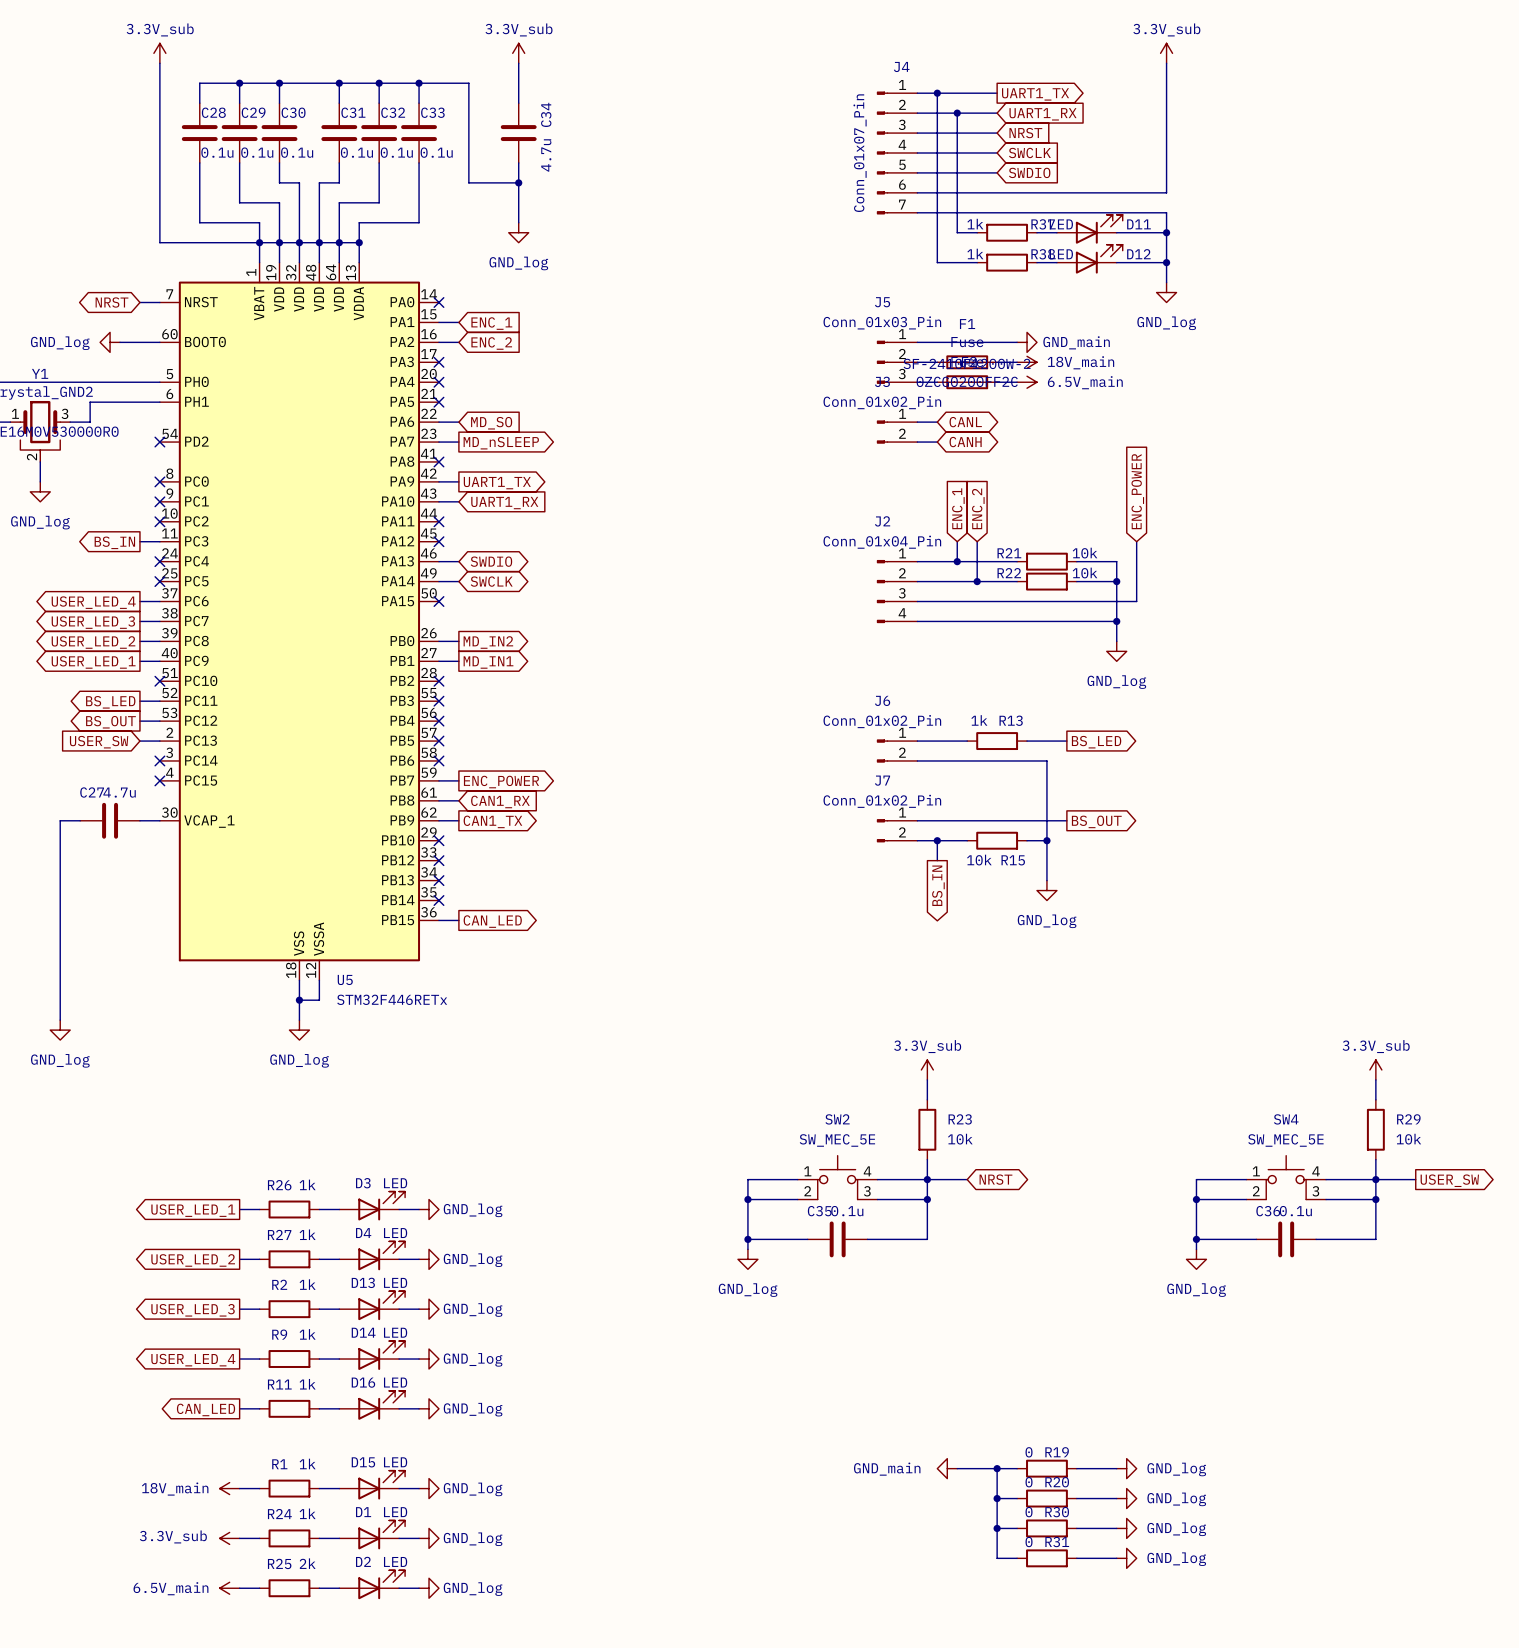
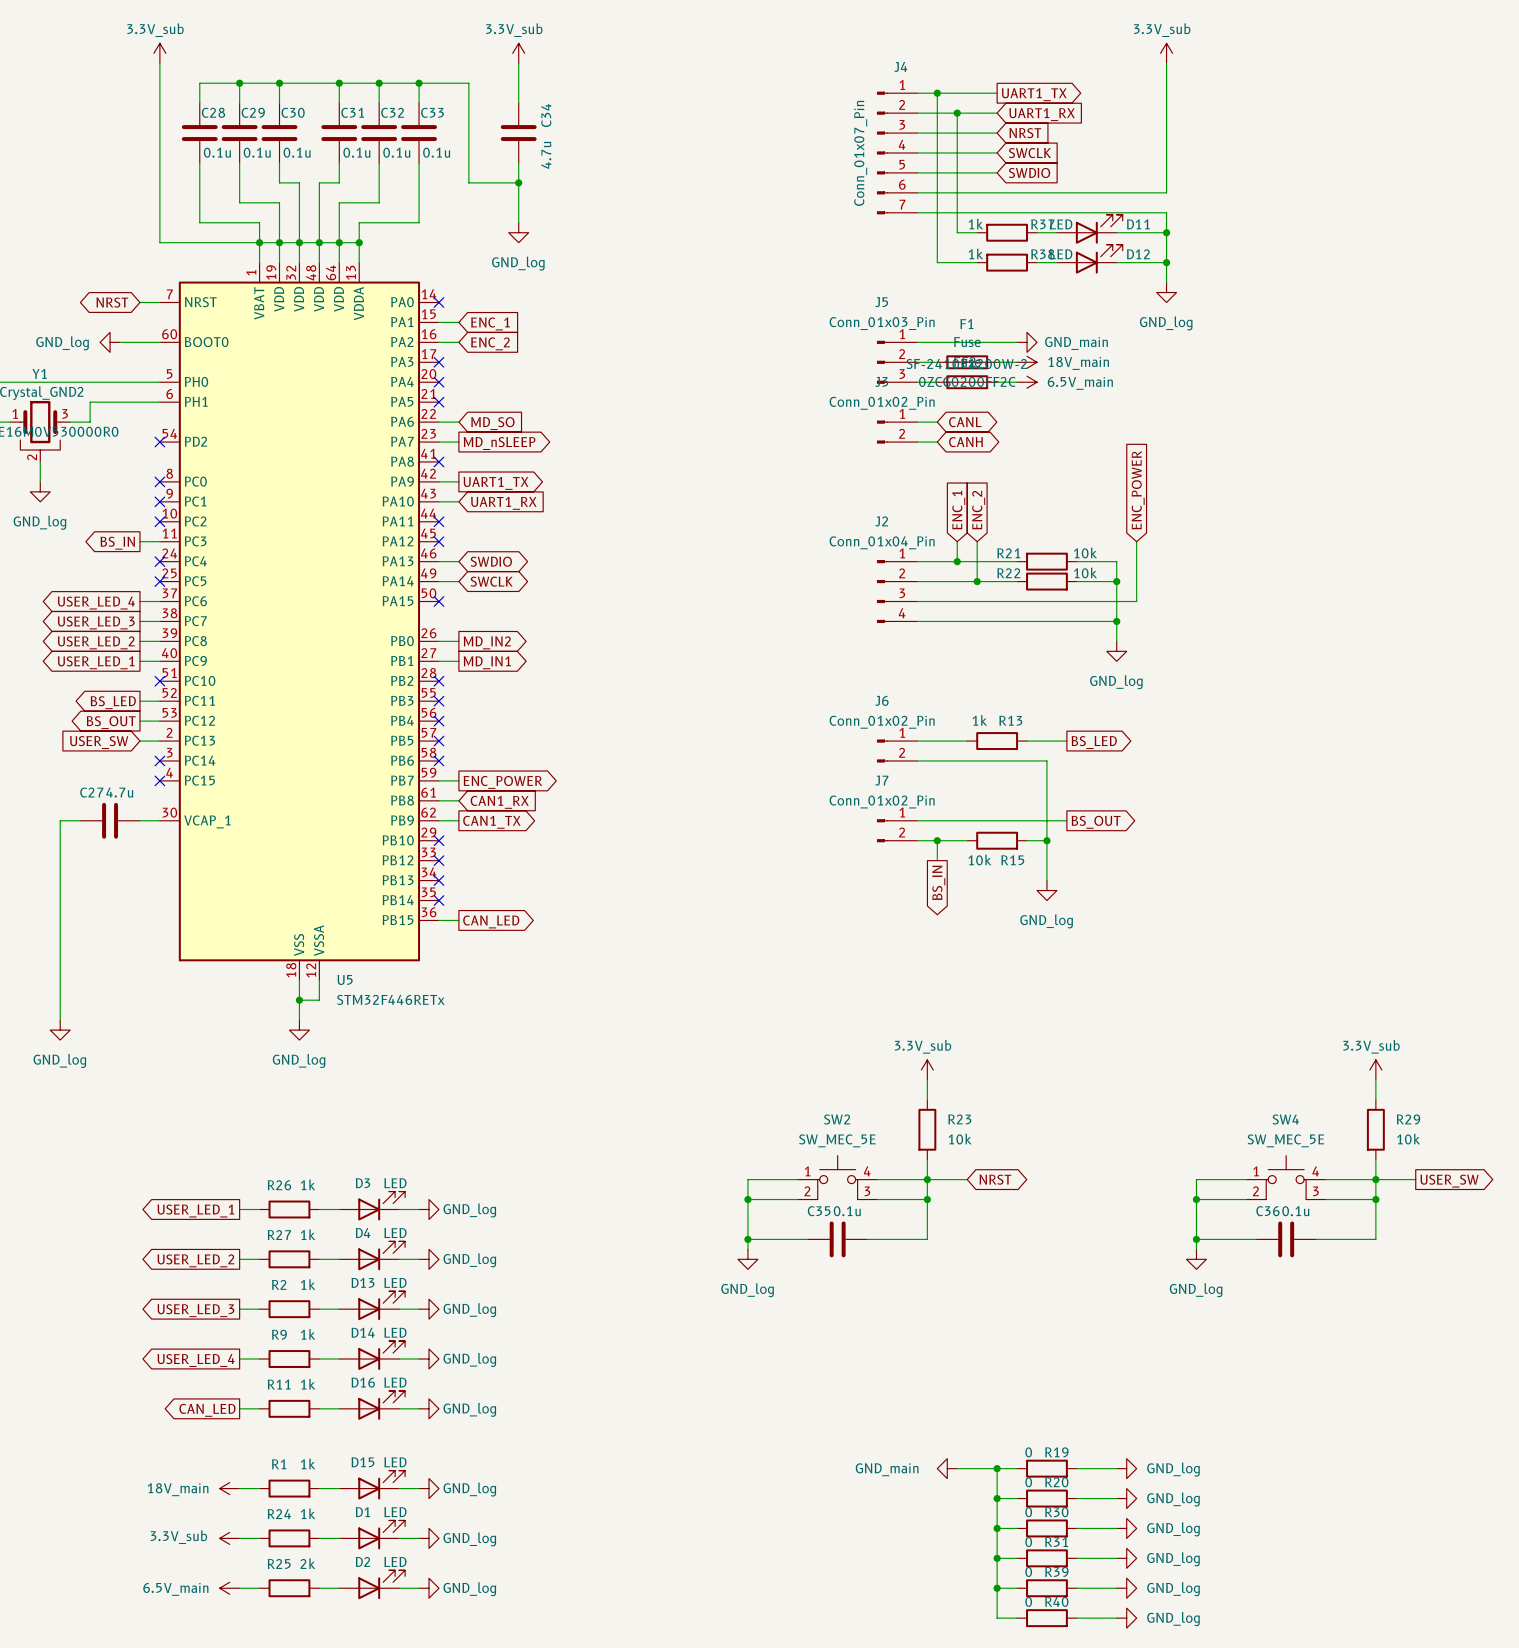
wire: none -> (997, 1558) (997, 1618) (1017, 1618)
junction: none -> (997, 1558)
wire: none -> (997, 1588) (1017, 1588)
junction: none -> (997, 1588)
R39: none -> 0 (1046, 1588)
wire: none -> (1076, 1588) (1116, 1588)
power symbol: none -> GND_log (1126, 1588)
R40: none -> 0 (1046, 1618)
wire: none -> (1076, 1618) (1116, 1618)
power symbol: none -> GND_log (1126, 1618)

